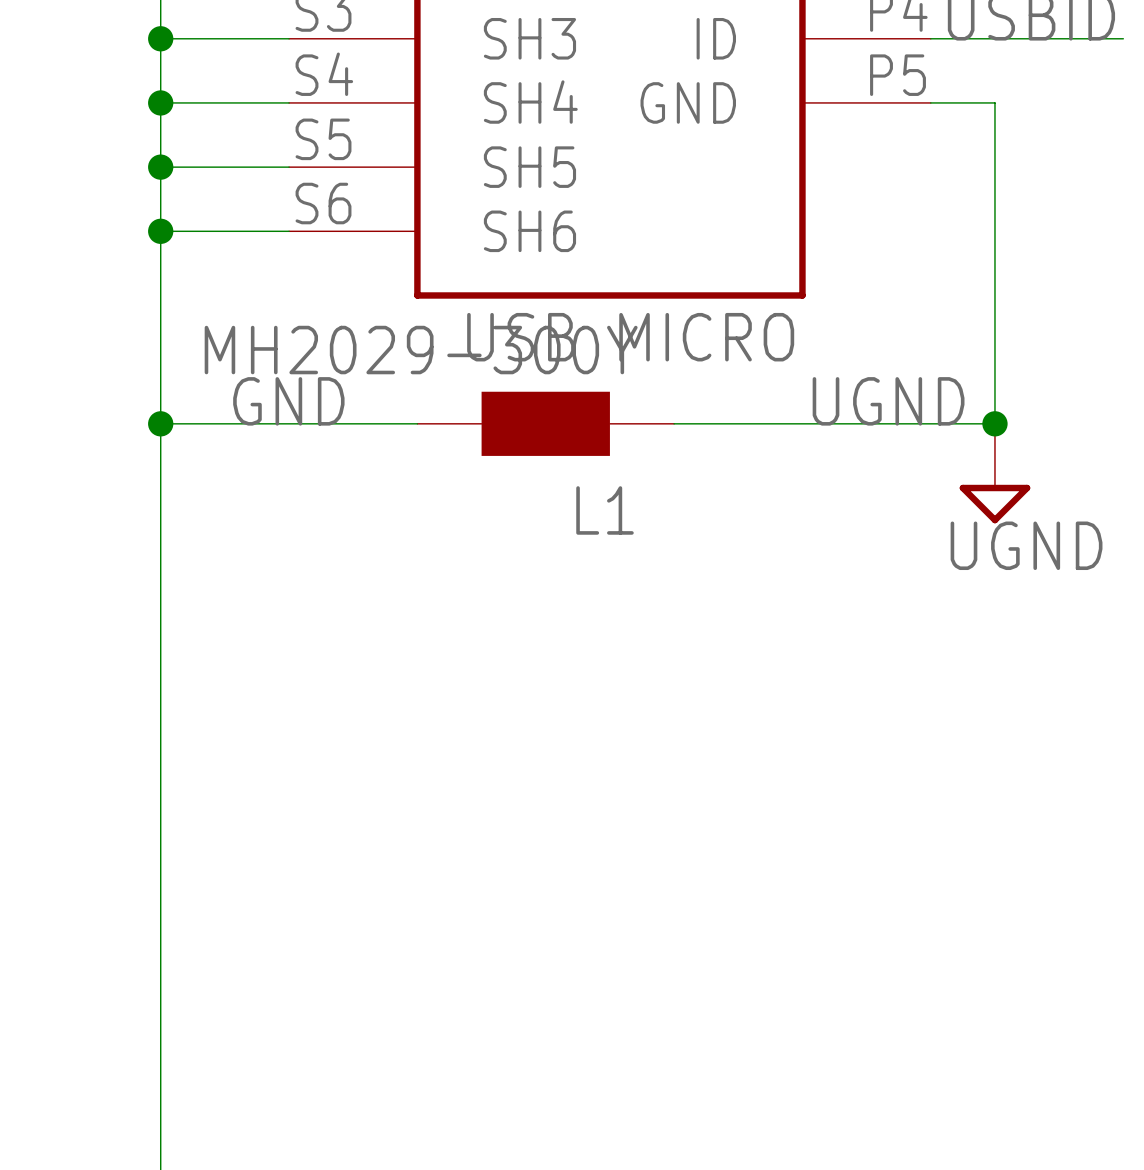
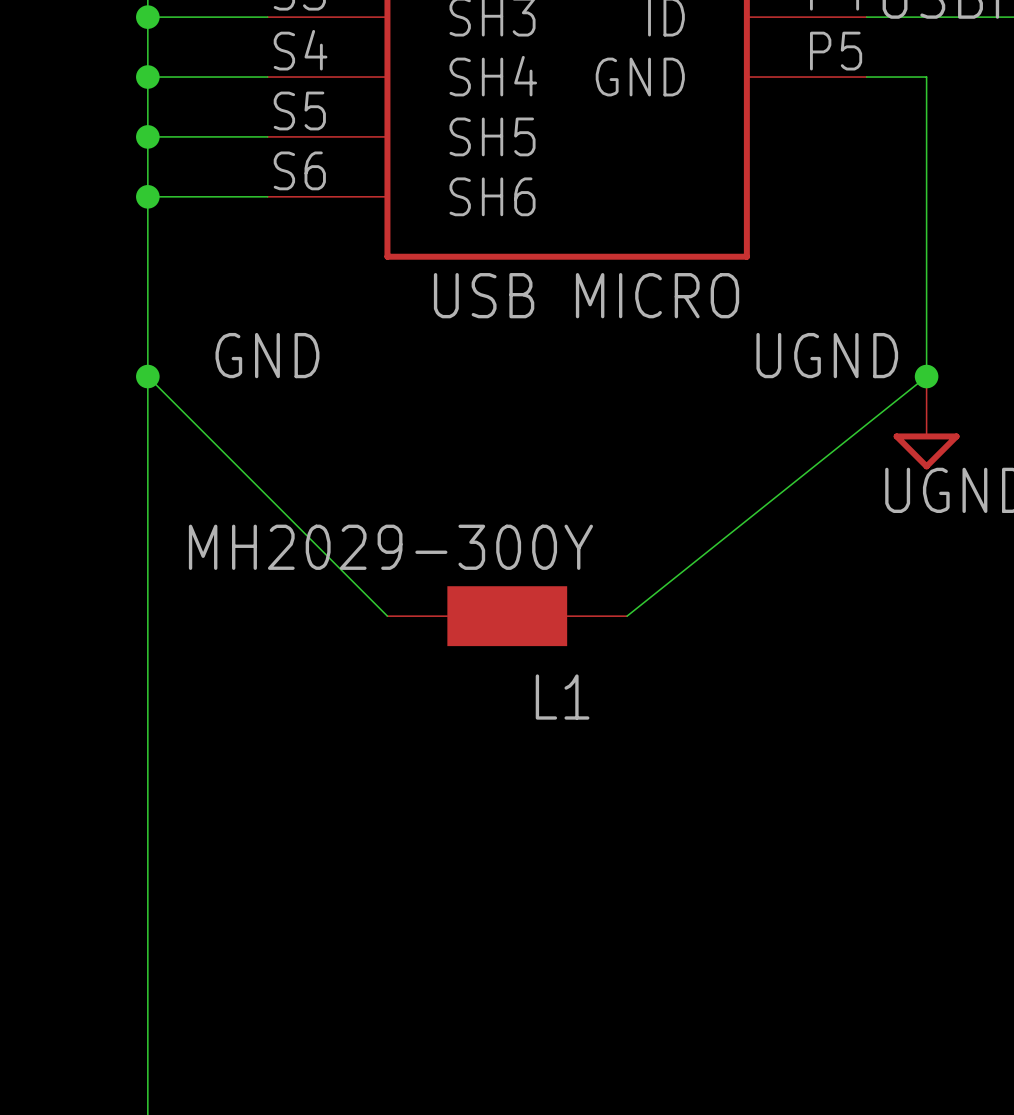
wire: (160, 423) (417, 423) -> (147, 376) (387, 616)
L1 position: (545, 423) -> (507, 616)
wire: (674, 423) (994, 423) -> (627, 616) (926, 376)

